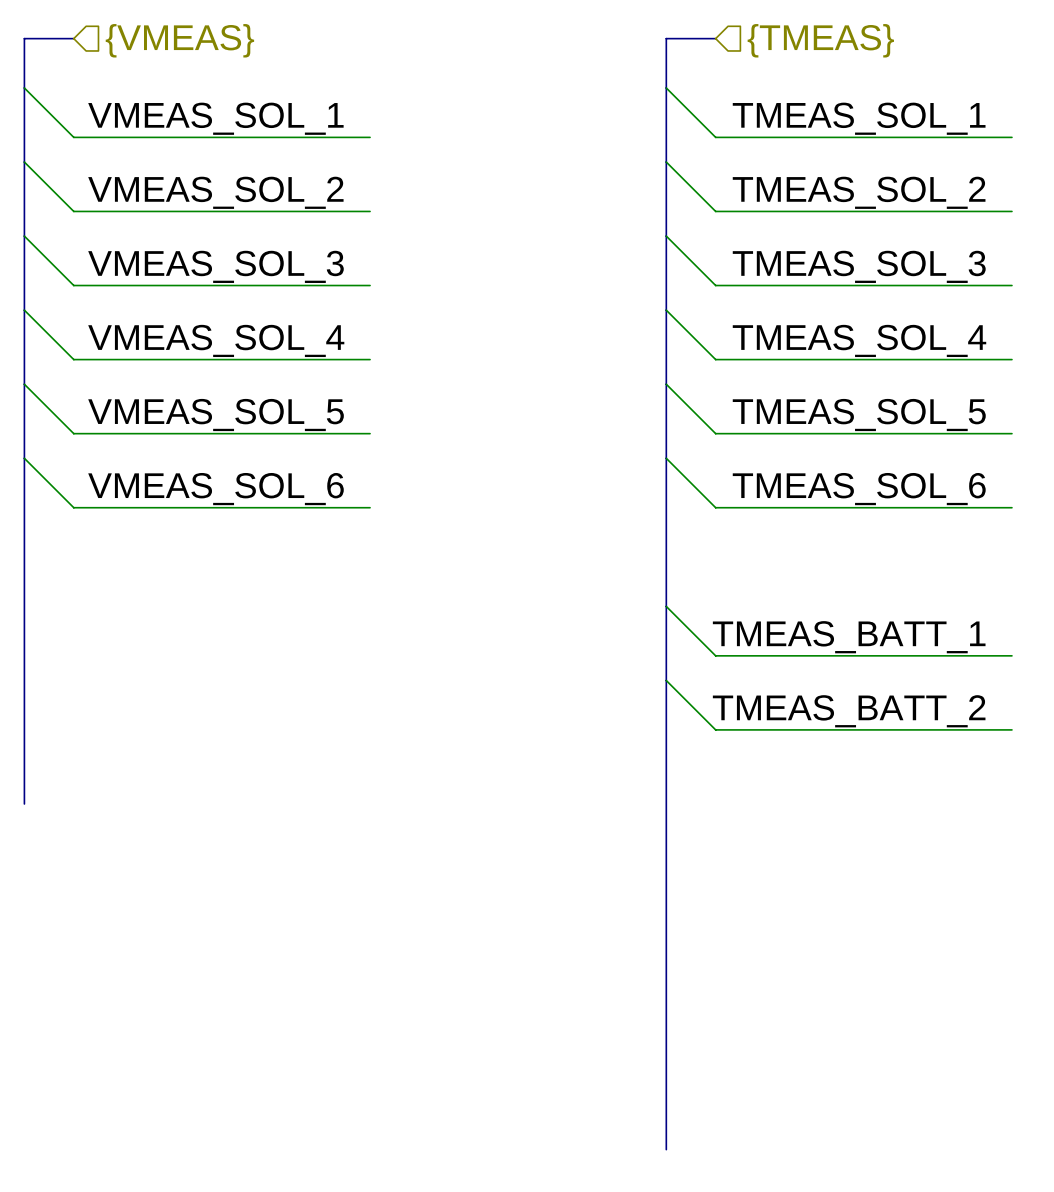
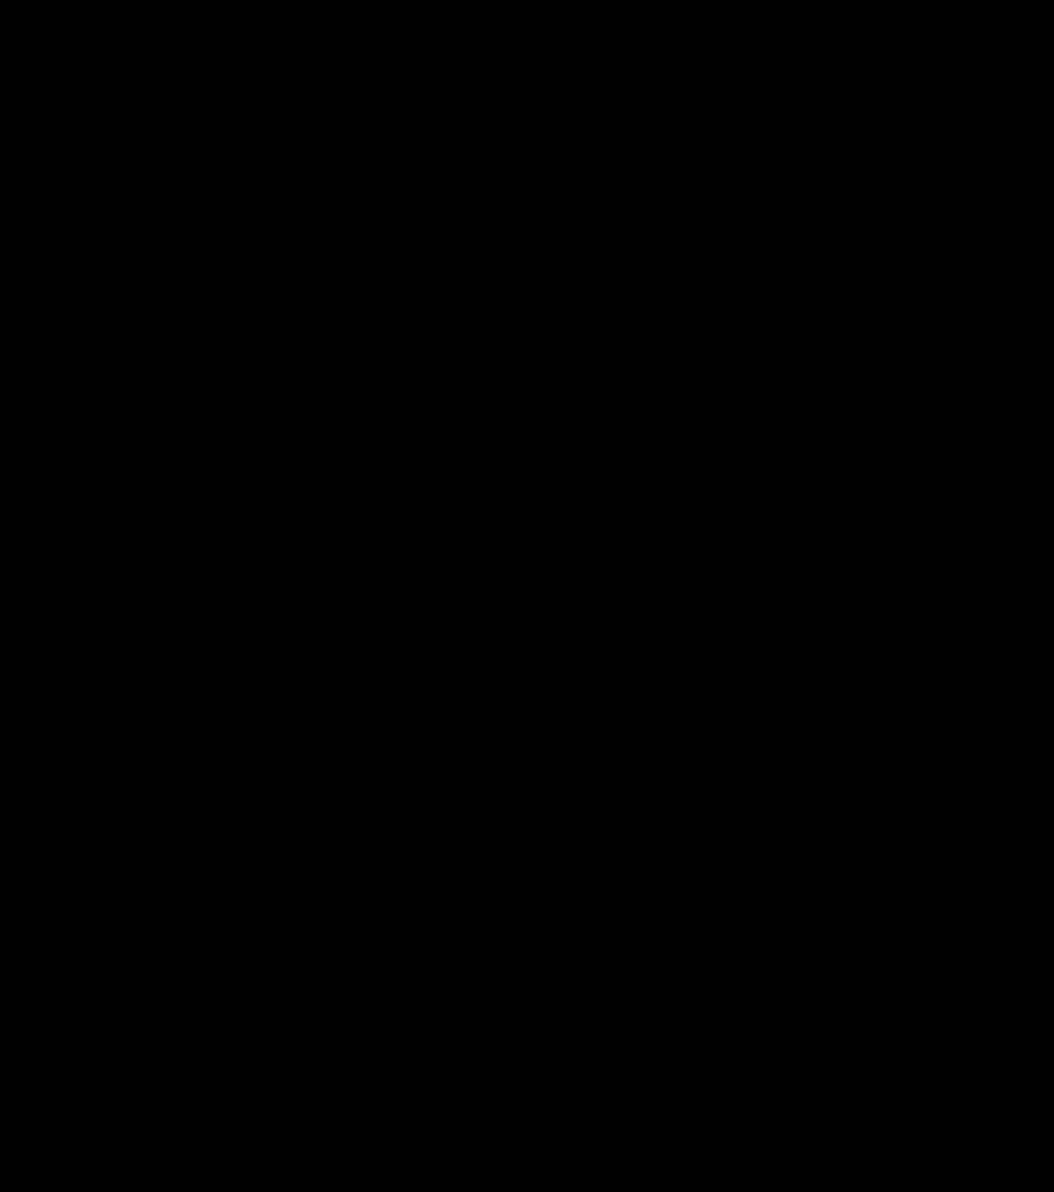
bus: (73, 38) (24, 38) (24, 803) -> none
bus: (715, 38) (666, 38) (666, 1149) -> none
hierarchical label: {VMEAS} (179, 40) -> none
hierarchical label: {TMEAS} (820, 40) -> none
wire: (24, 88) (73, 137) (370, 137) -> none
wire: (666, 88) (715, 137) (1011, 137) -> none
label: VMEAS_SOL_1 (215, 118) -> none
label: TMEAS_SOL_1 (859, 118) -> none
wire: (24, 162) (73, 211) (370, 211) -> none
wire: (666, 162) (715, 211) (1011, 211) -> none
label: VMEAS_SOL_2 (215, 192) -> none
label: TMEAS_SOL_2 (859, 192) -> none
wire: (24, 236) (73, 285) (370, 285) -> none
wire: (666, 236) (715, 285) (1011, 285) -> none
label: VMEAS_SOL_3 (215, 266) -> none
label: TMEAS_SOL_3 (859, 266) -> none
wire: (24, 310) (73, 359) (370, 359) -> none
wire: (666, 310) (715, 359) (1011, 359) -> none
label: VMEAS_SOL_4 (216, 340) -> none
label: TMEAS_SOL_4 (859, 340) -> none
wire: (24, 384) (73, 433) (370, 433) -> none
wire: (666, 384) (715, 433) (1011, 433) -> none
label: VMEAS_SOL_5 (216, 415) -> none
label: TMEAS_SOL_5 (859, 415) -> none
wire: (24, 458) (73, 507) (370, 507) -> none
wire: (666, 458) (715, 507) (1011, 507) -> none
label: VMEAS_SOL_6 (215, 489) -> none
label: TMEAS_SOL_6 (859, 489) -> none
wire: (666, 606) (715, 655) (1011, 655) -> none
label: TMEAS_BATT_1 (849, 637) -> none
wire: (666, 680) (715, 729) (1011, 729) -> none
label: TMEAS_BATT_2 (849, 711) -> none

